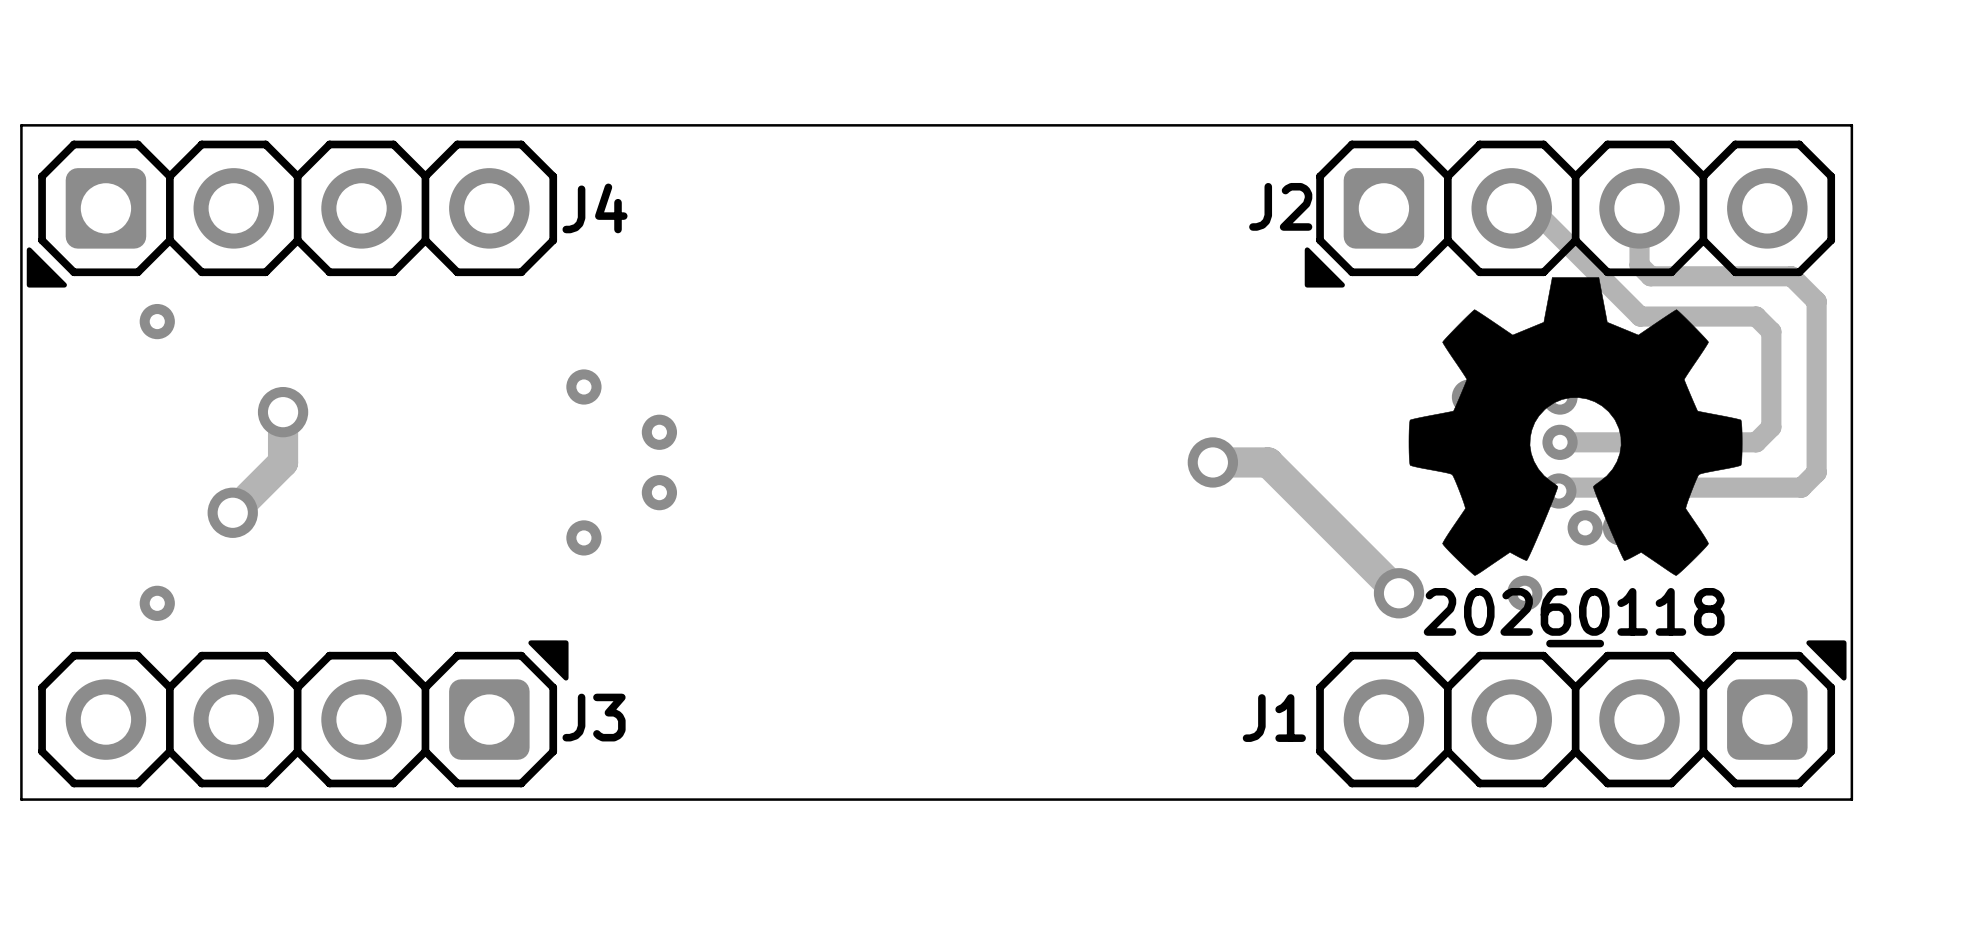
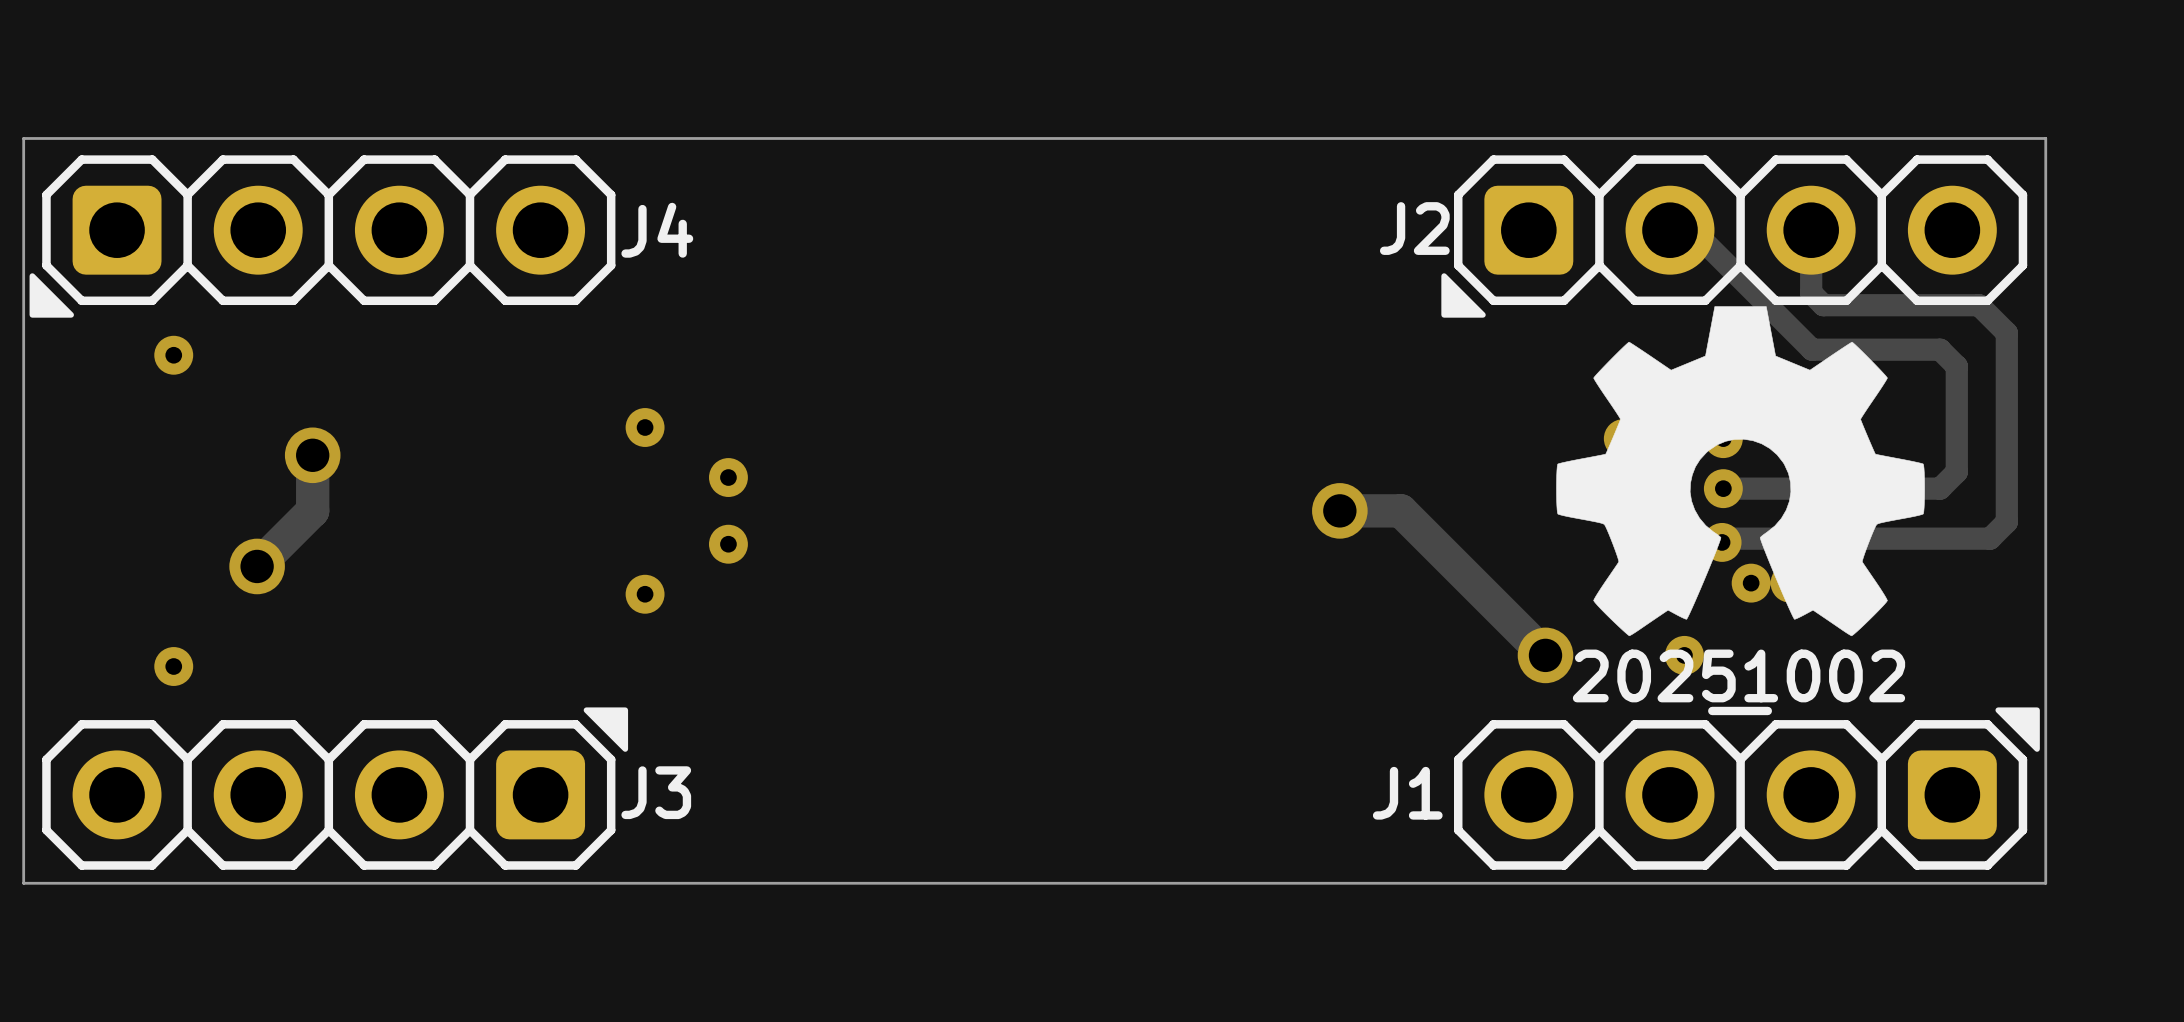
drawing shape: [1423, 588, 1725, 648] -> [1572, 649, 1906, 716]

